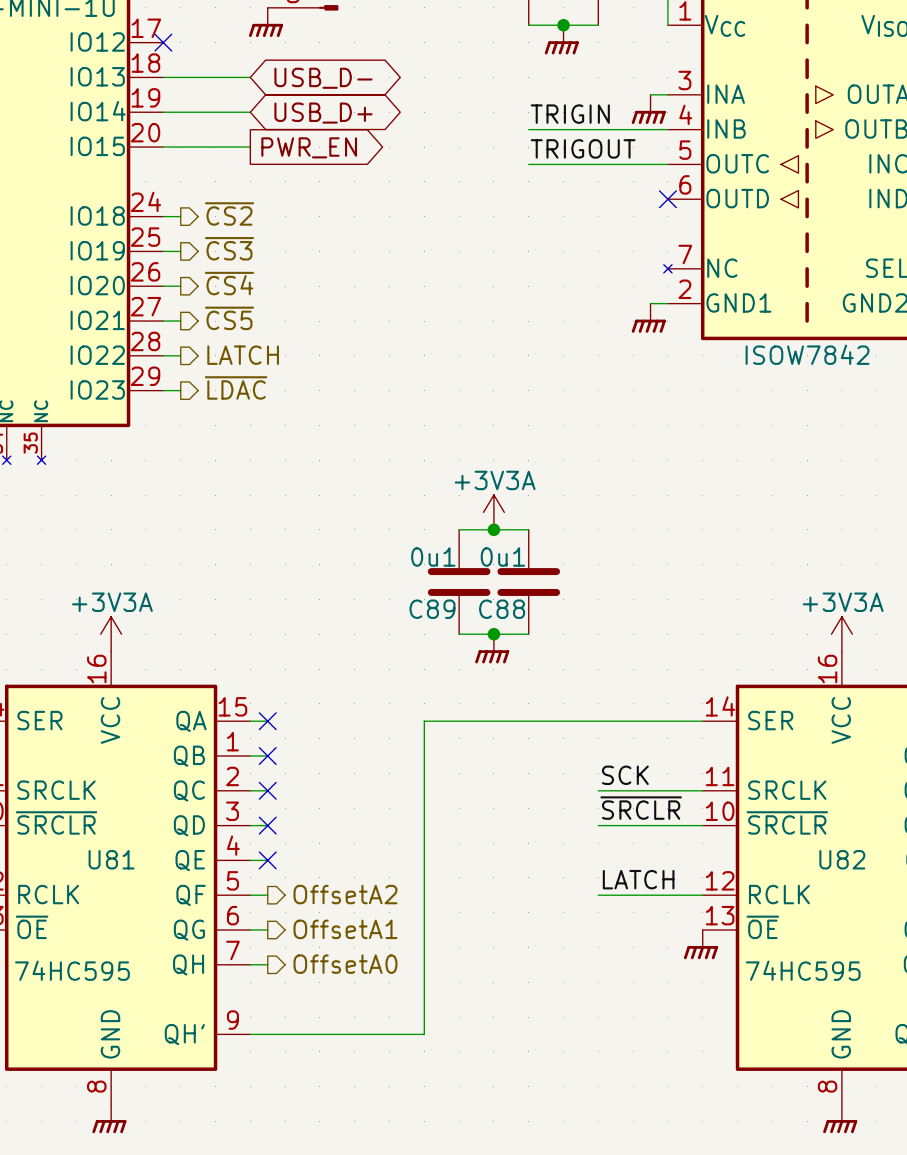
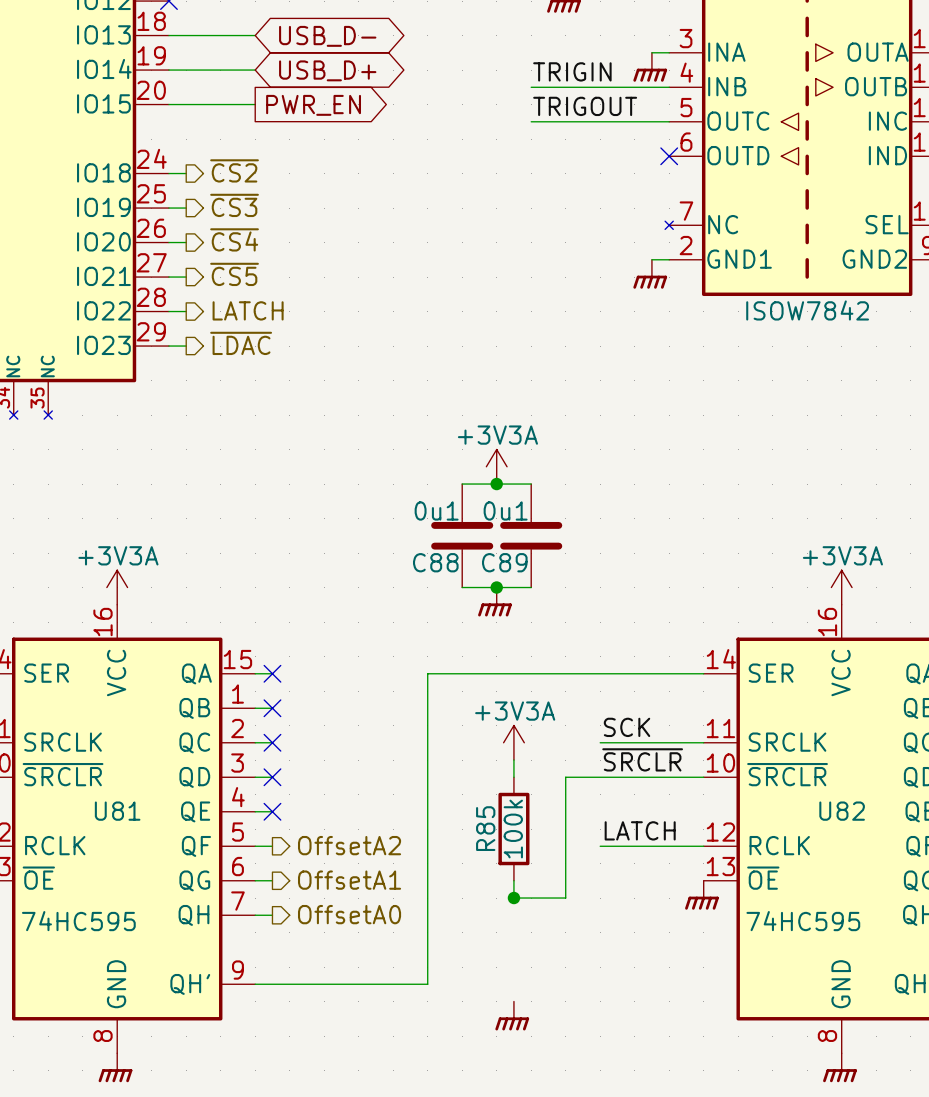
C89 name: C89 (432, 609) -> C88 (435, 562)
C88 name: C88 (502, 609) -> C89 (504, 562)
power symbol: none -> +3V3A (513, 742)
wire: none -> (513, 760) (513, 777)
wire: none -> (600, 777) (565, 777) (565, 898) (513, 898) (513, 880)
R85: none -> 100k (513, 829)
junction: none -> (513, 898)
power symbol: none -> (512, 1015)

